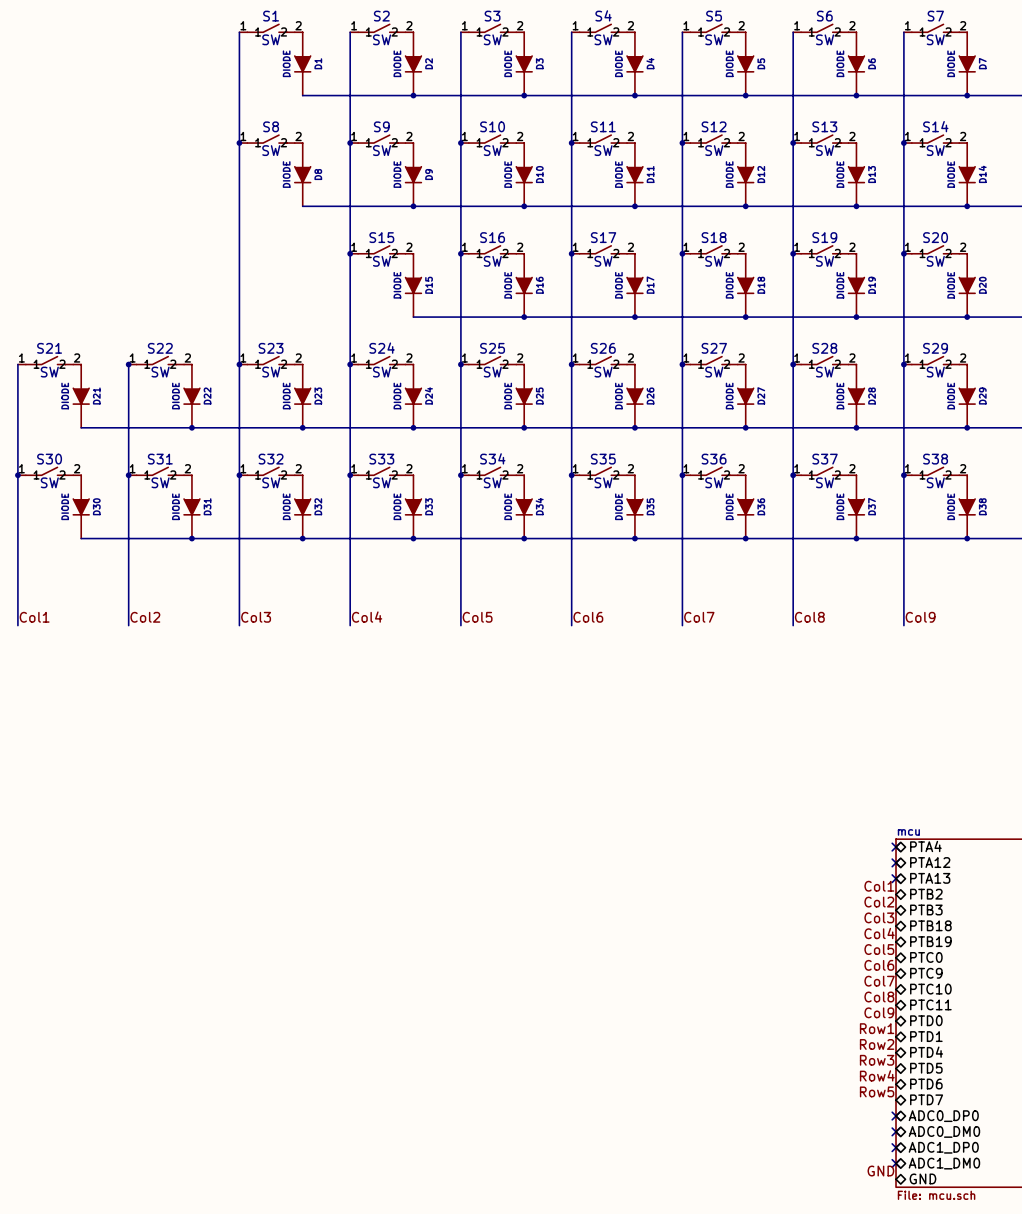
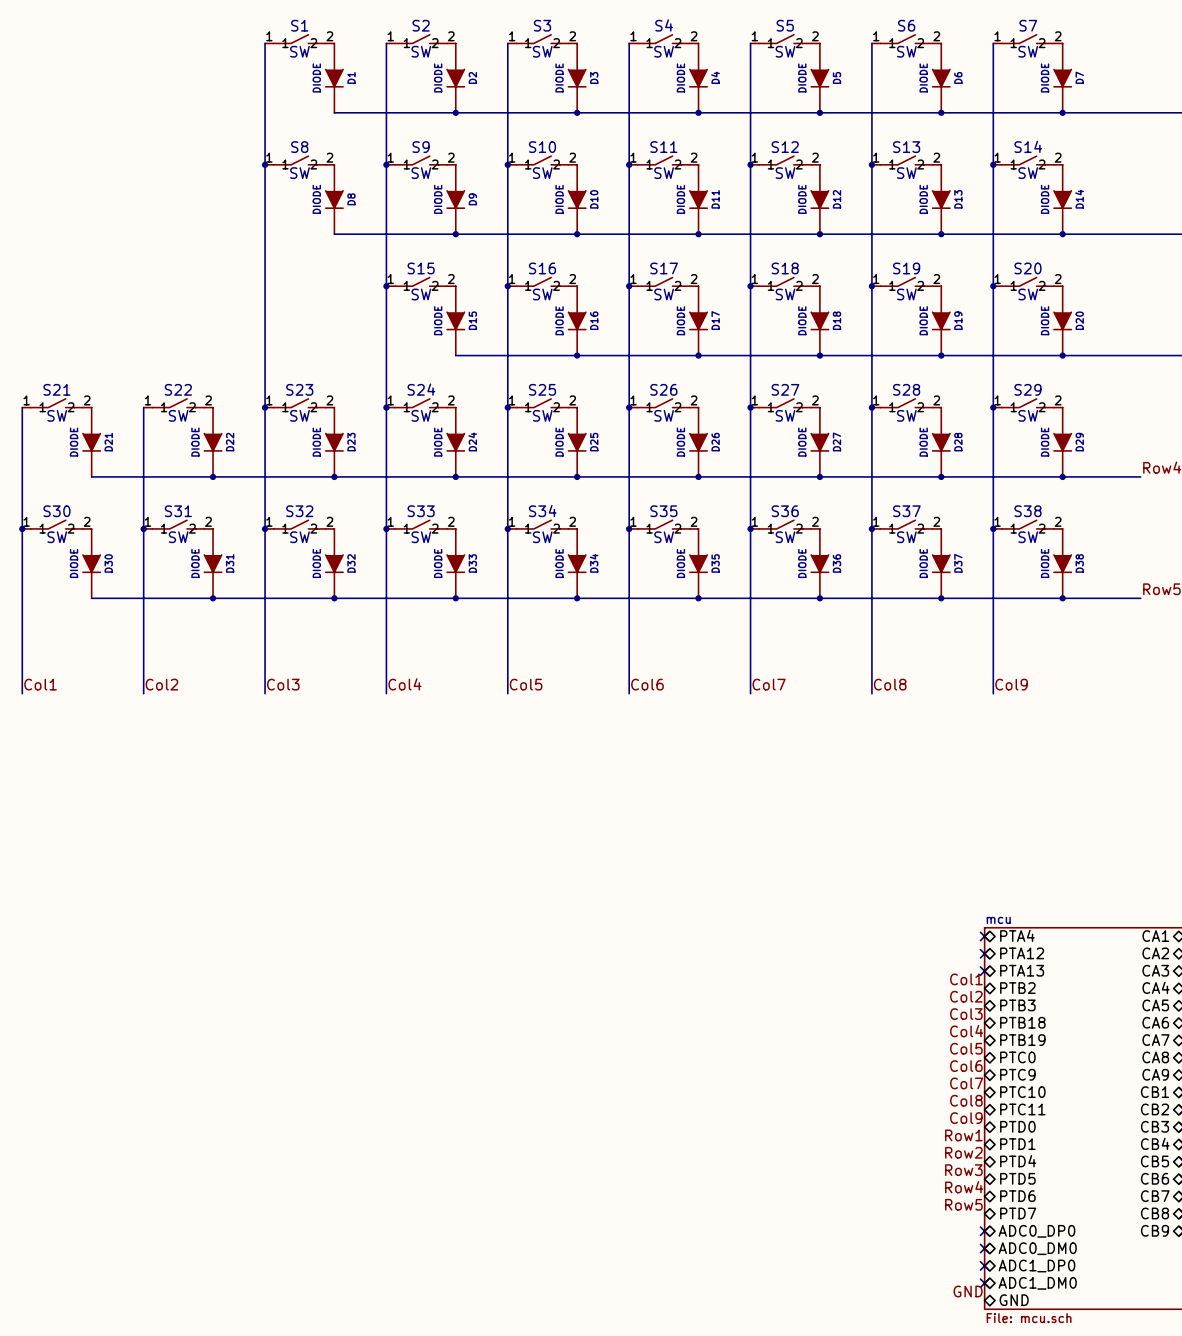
junction: (128, 364) -> none

